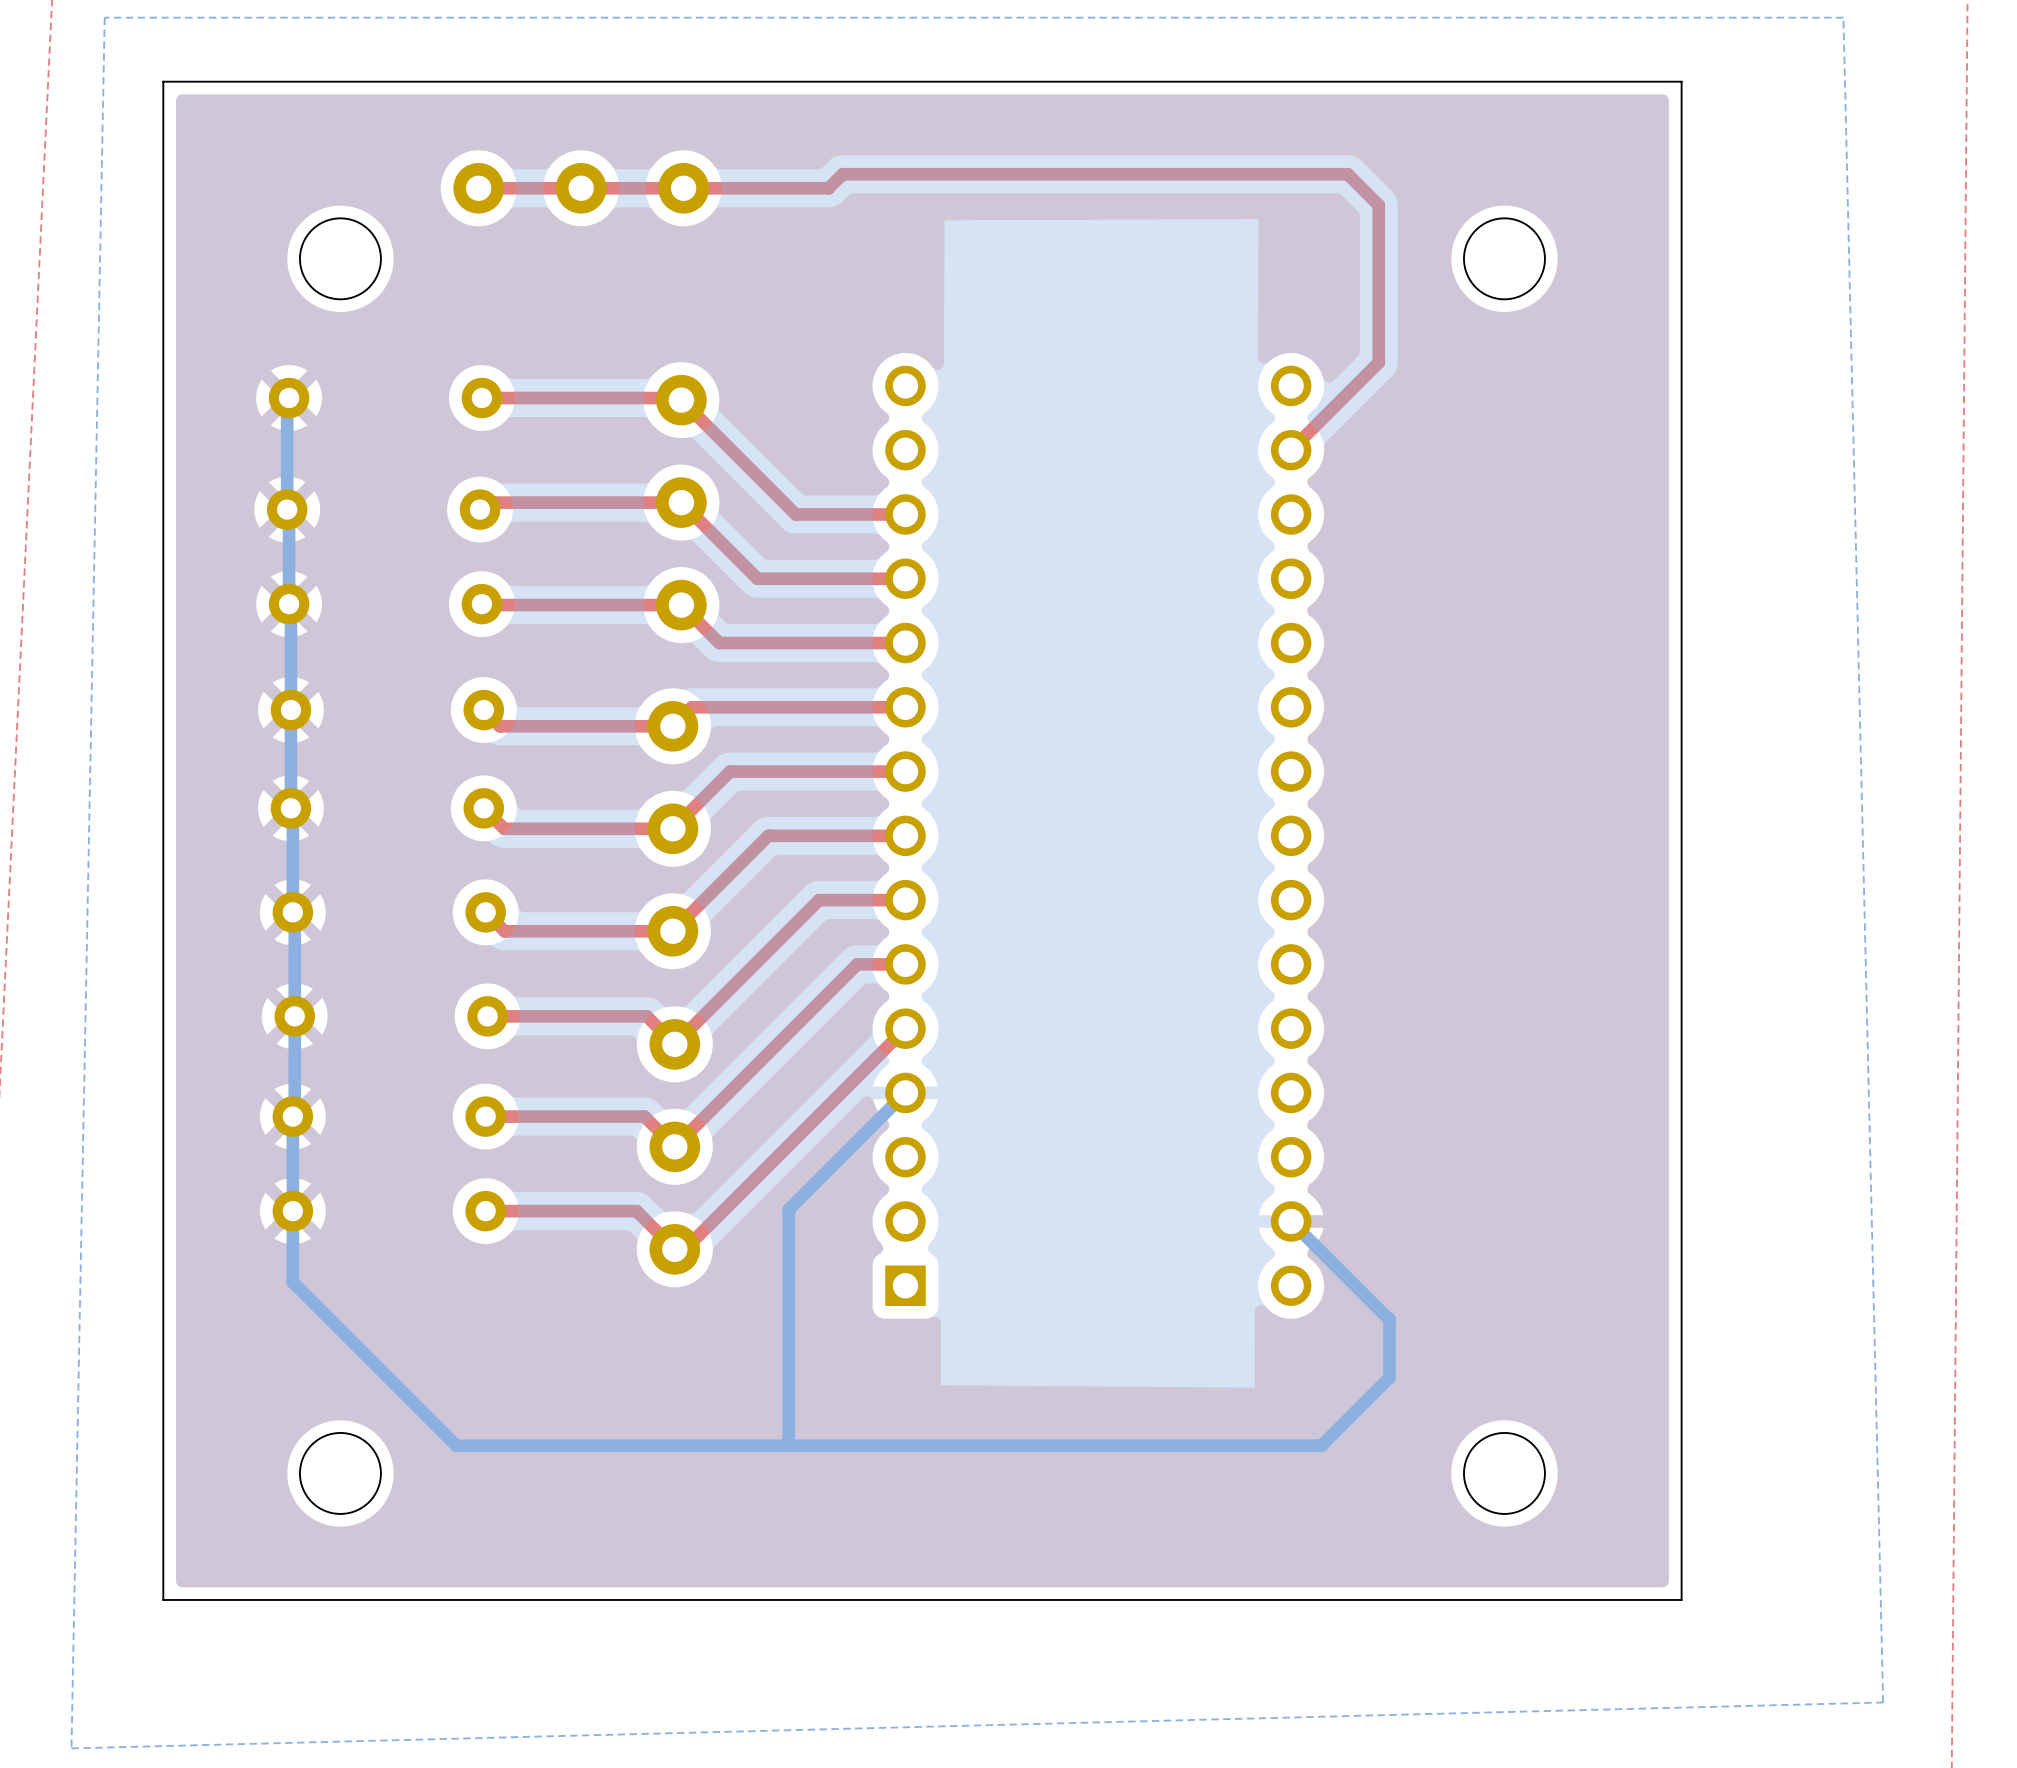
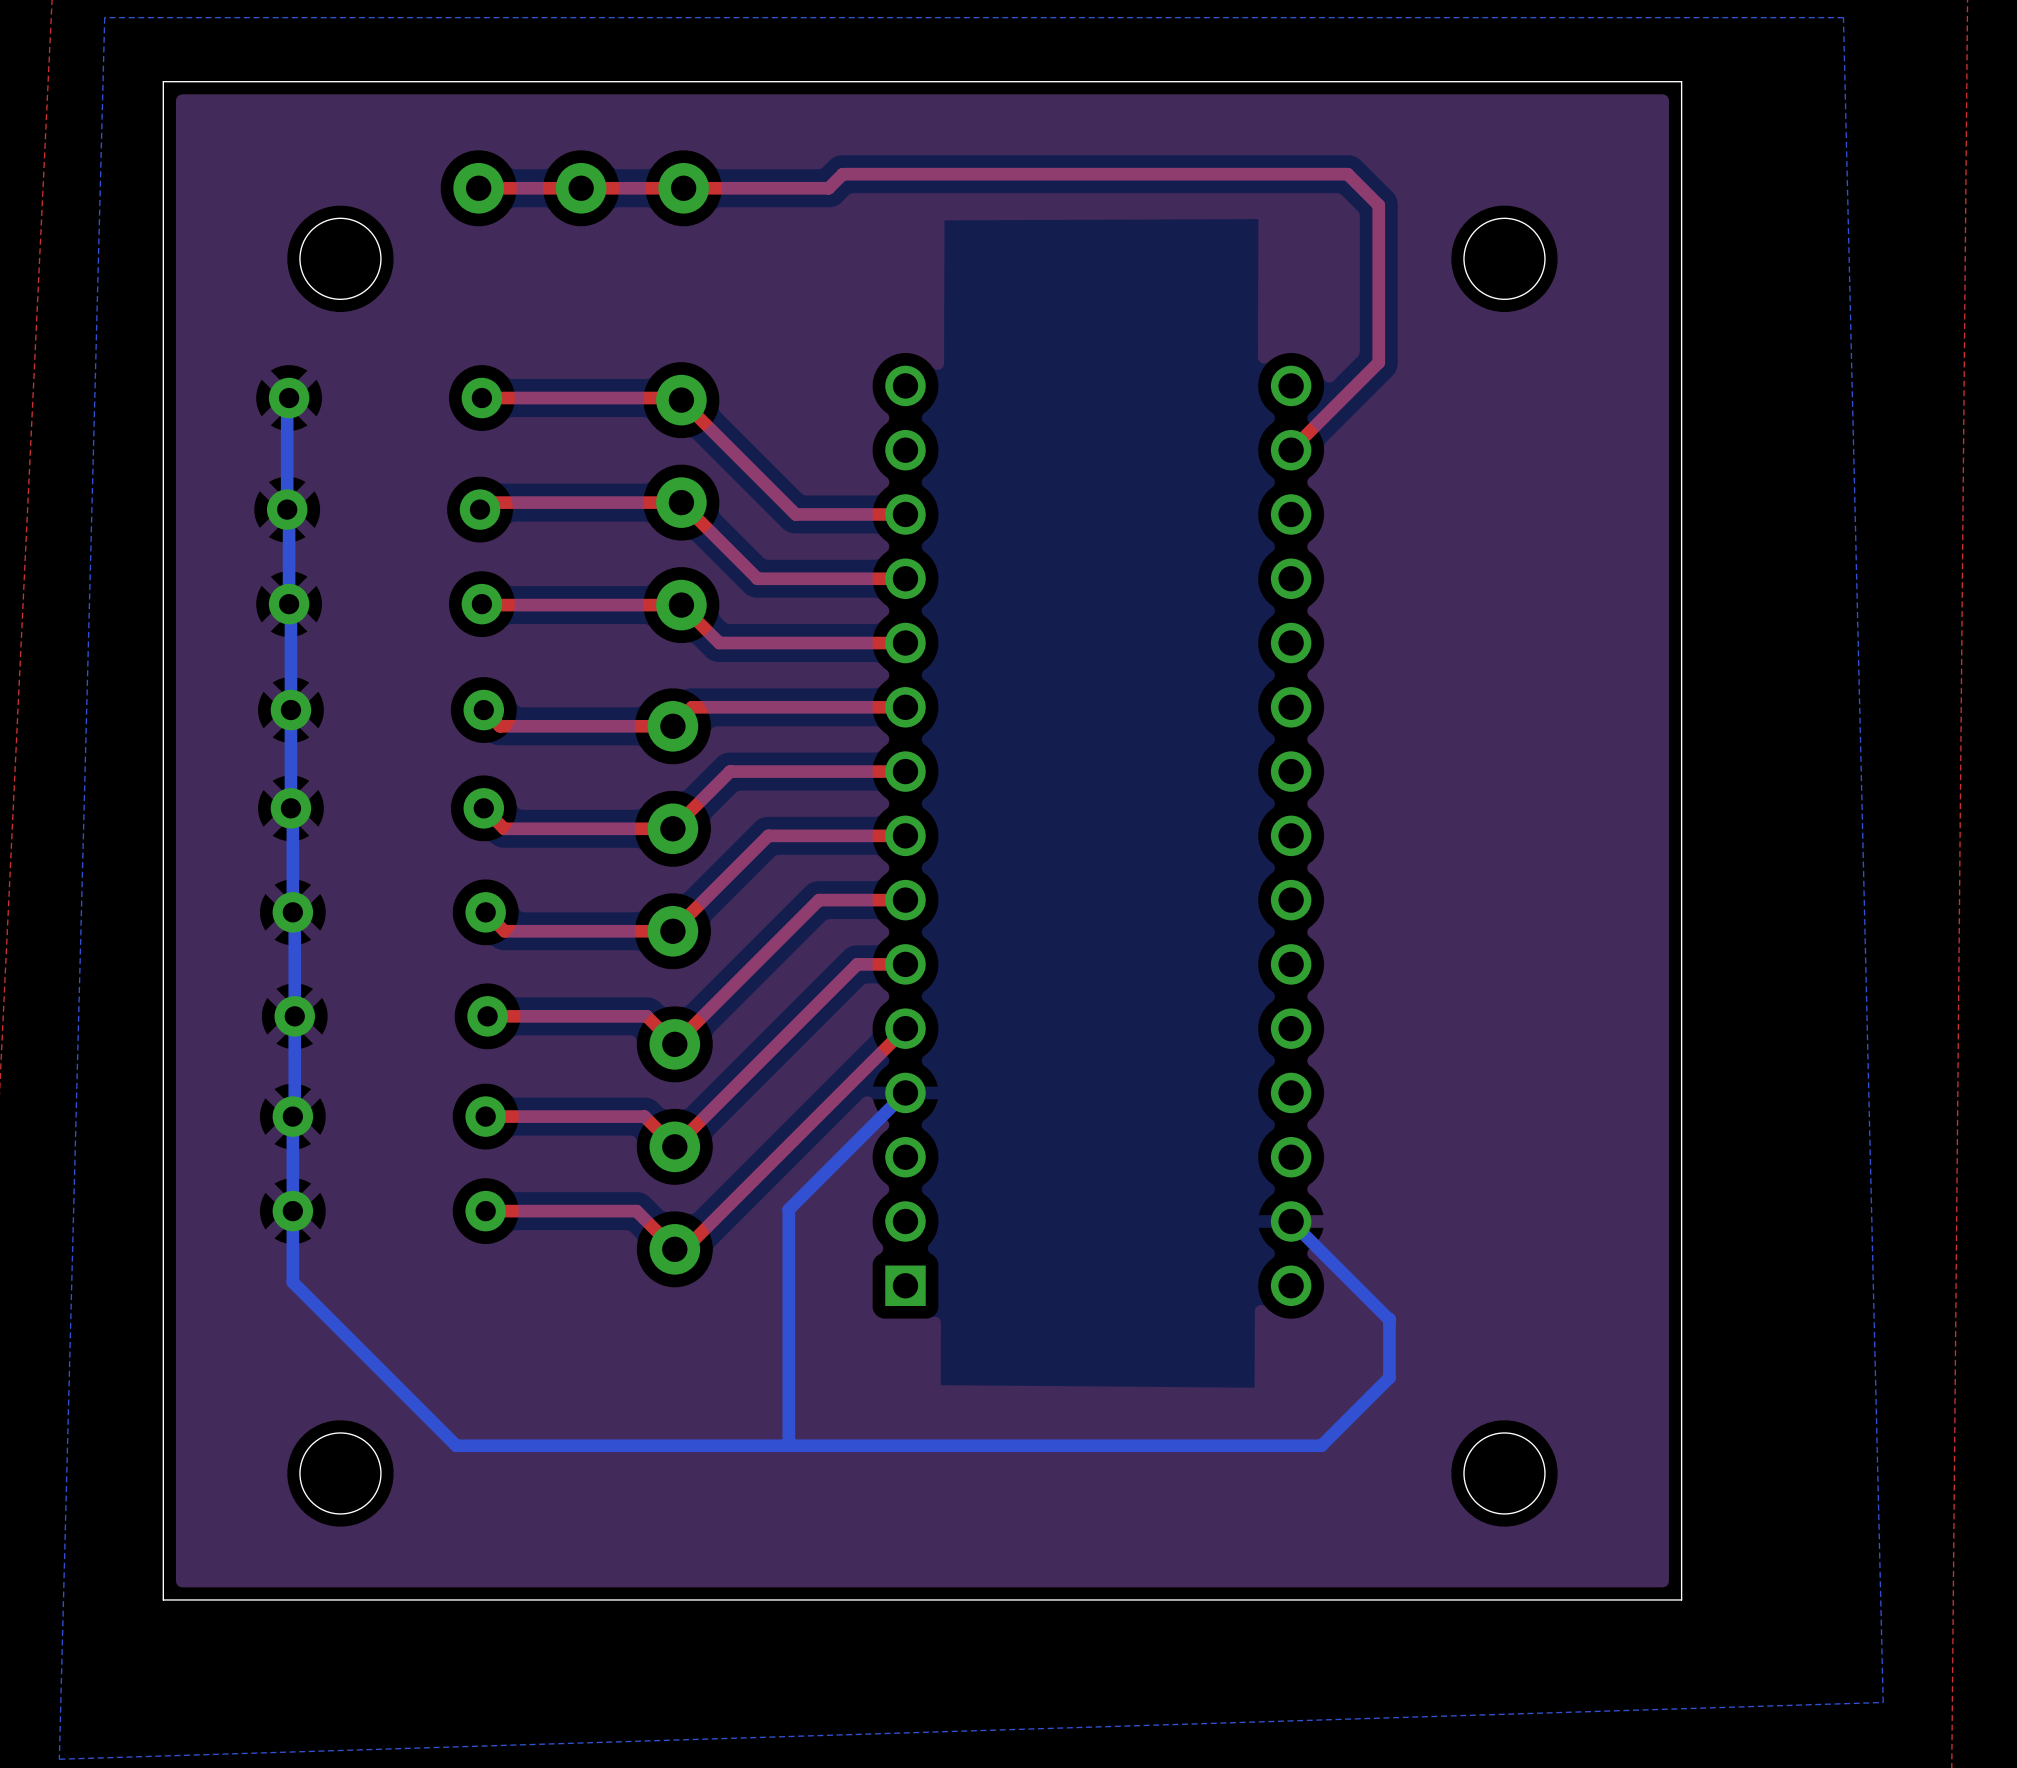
bottom zone outline: (104, 17) (71, 1748) (1883, 1702) -> (104, 17) (59, 1759) (1883, 1702)

